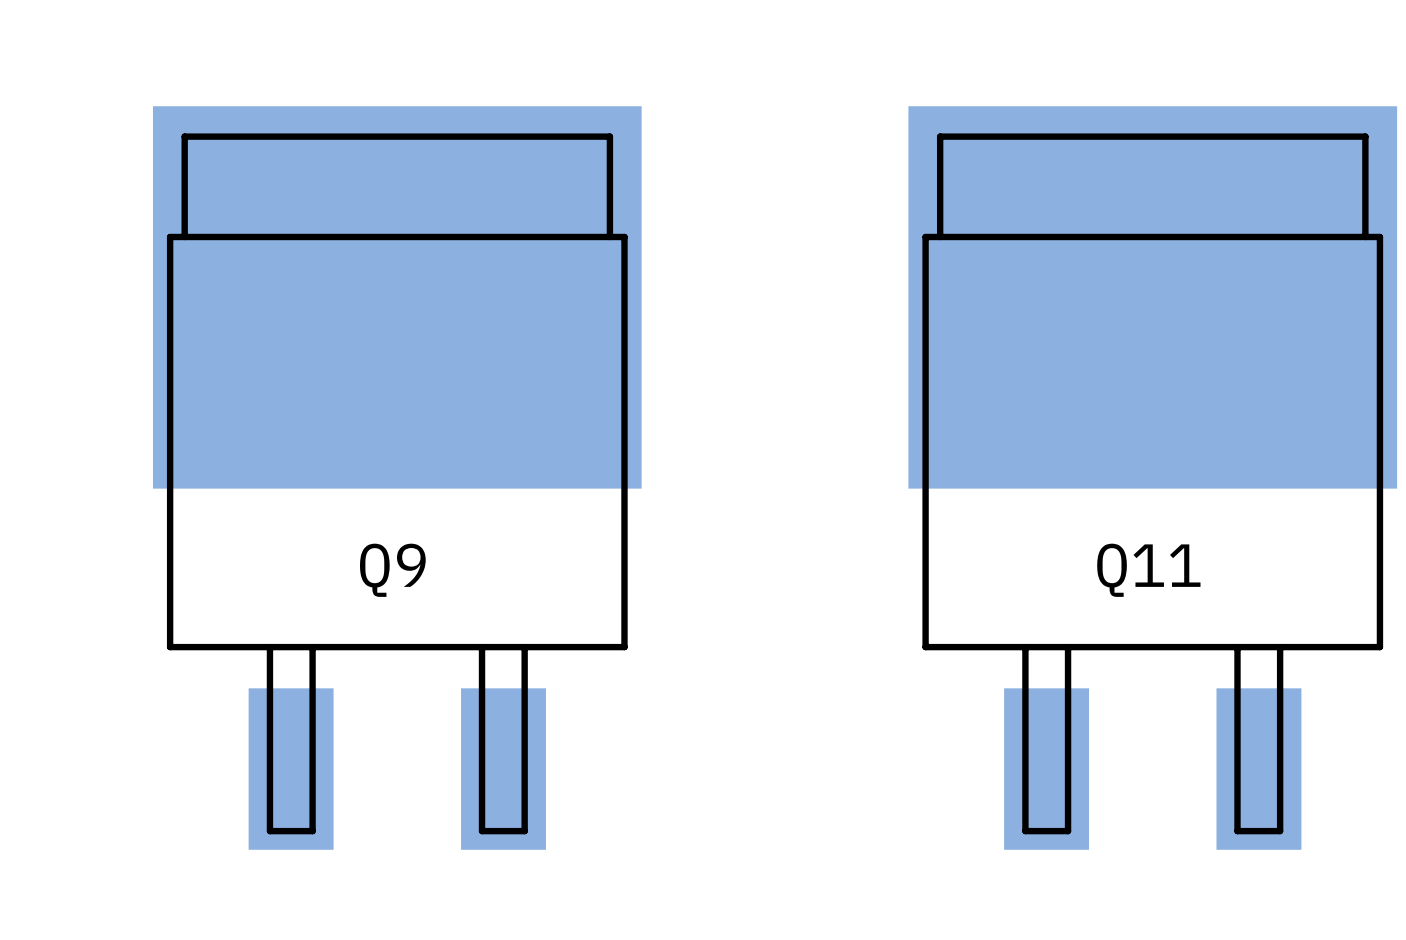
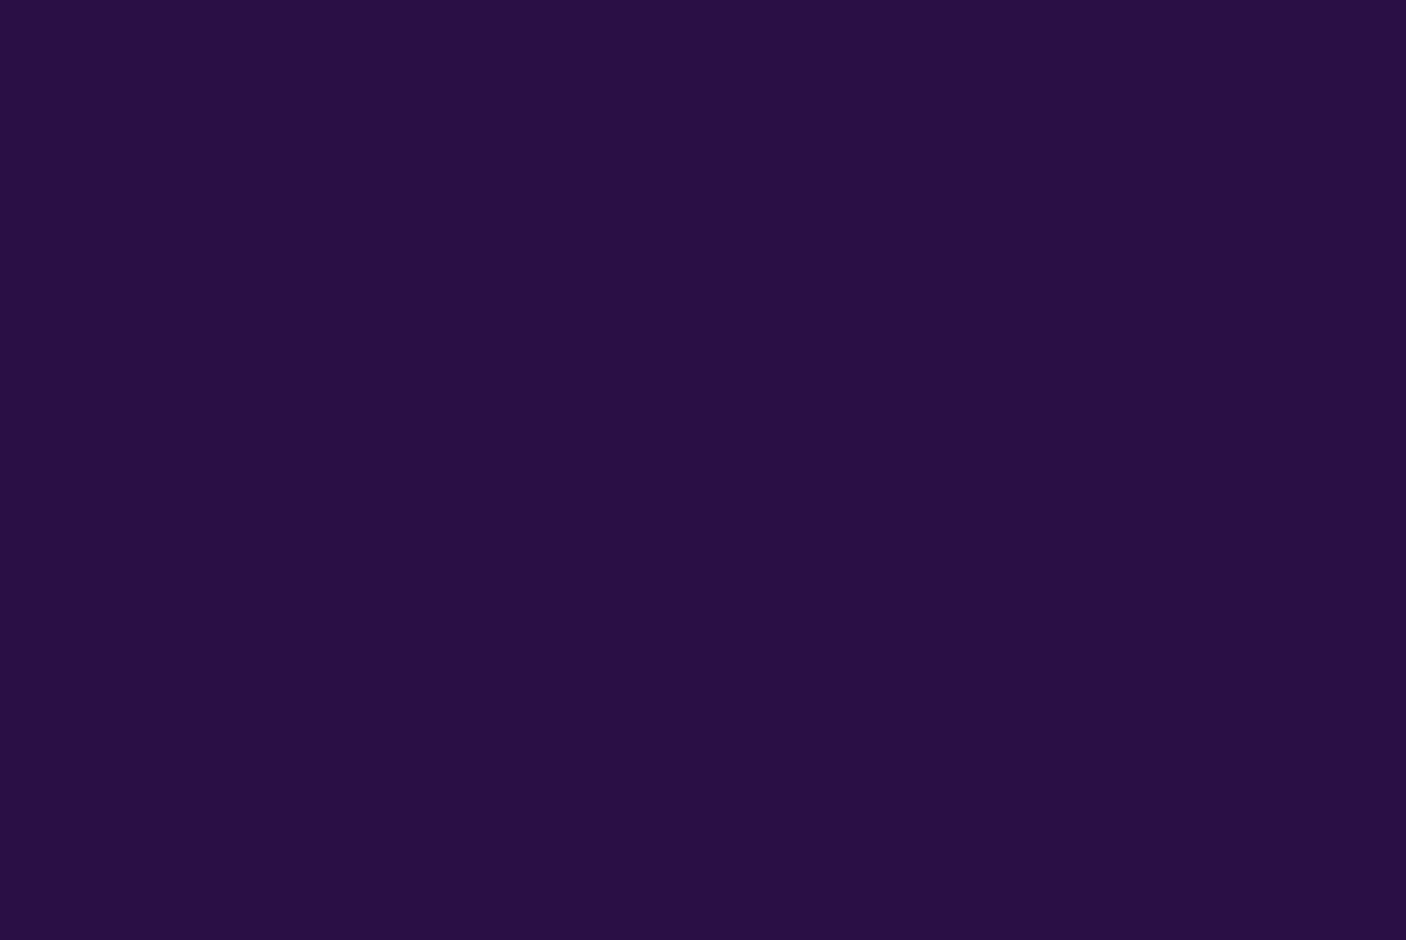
Q9: (397, 478) -> none
Q11: (1152, 478) -> none

